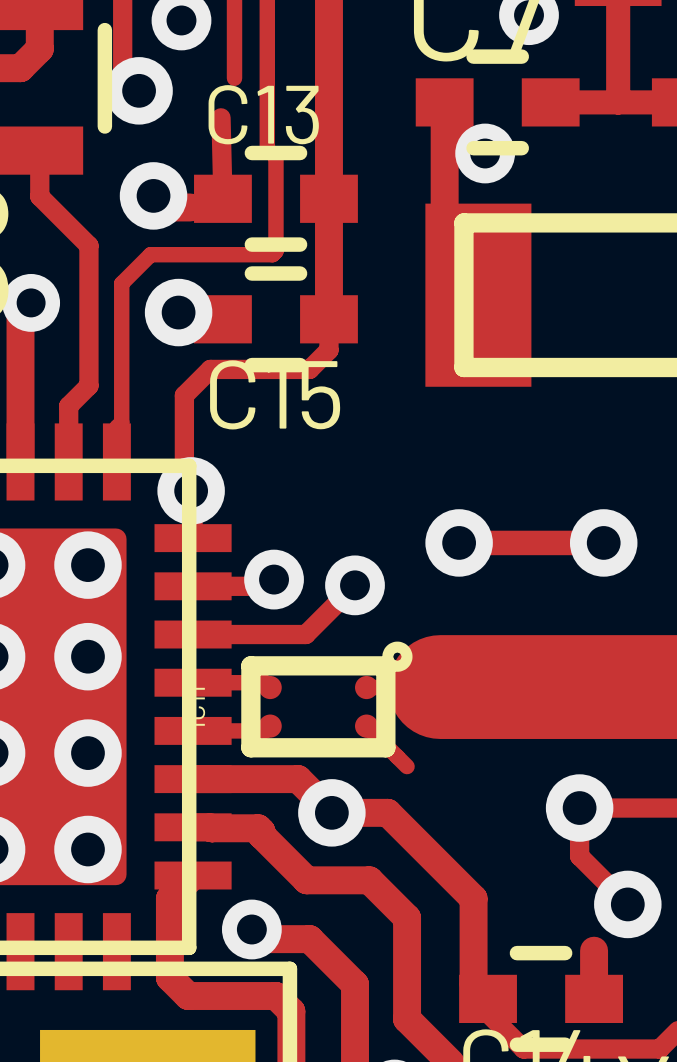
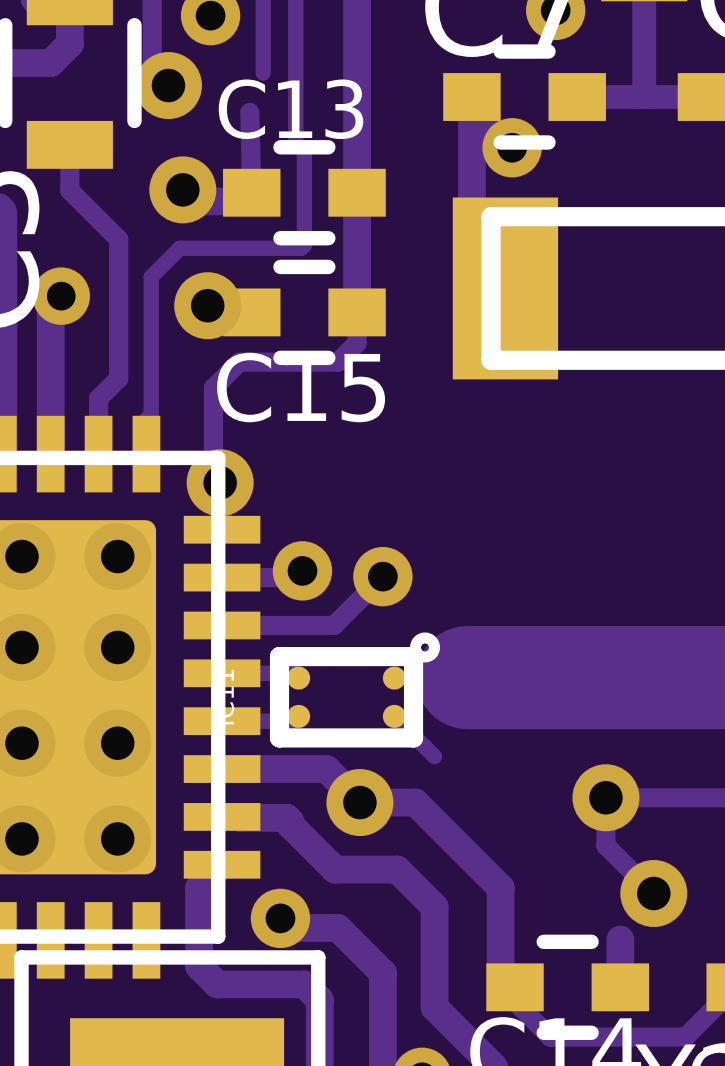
track: (459, 542) (603, 542) -> none
via: (459, 542) -> none
via: (603, 542) -> none

